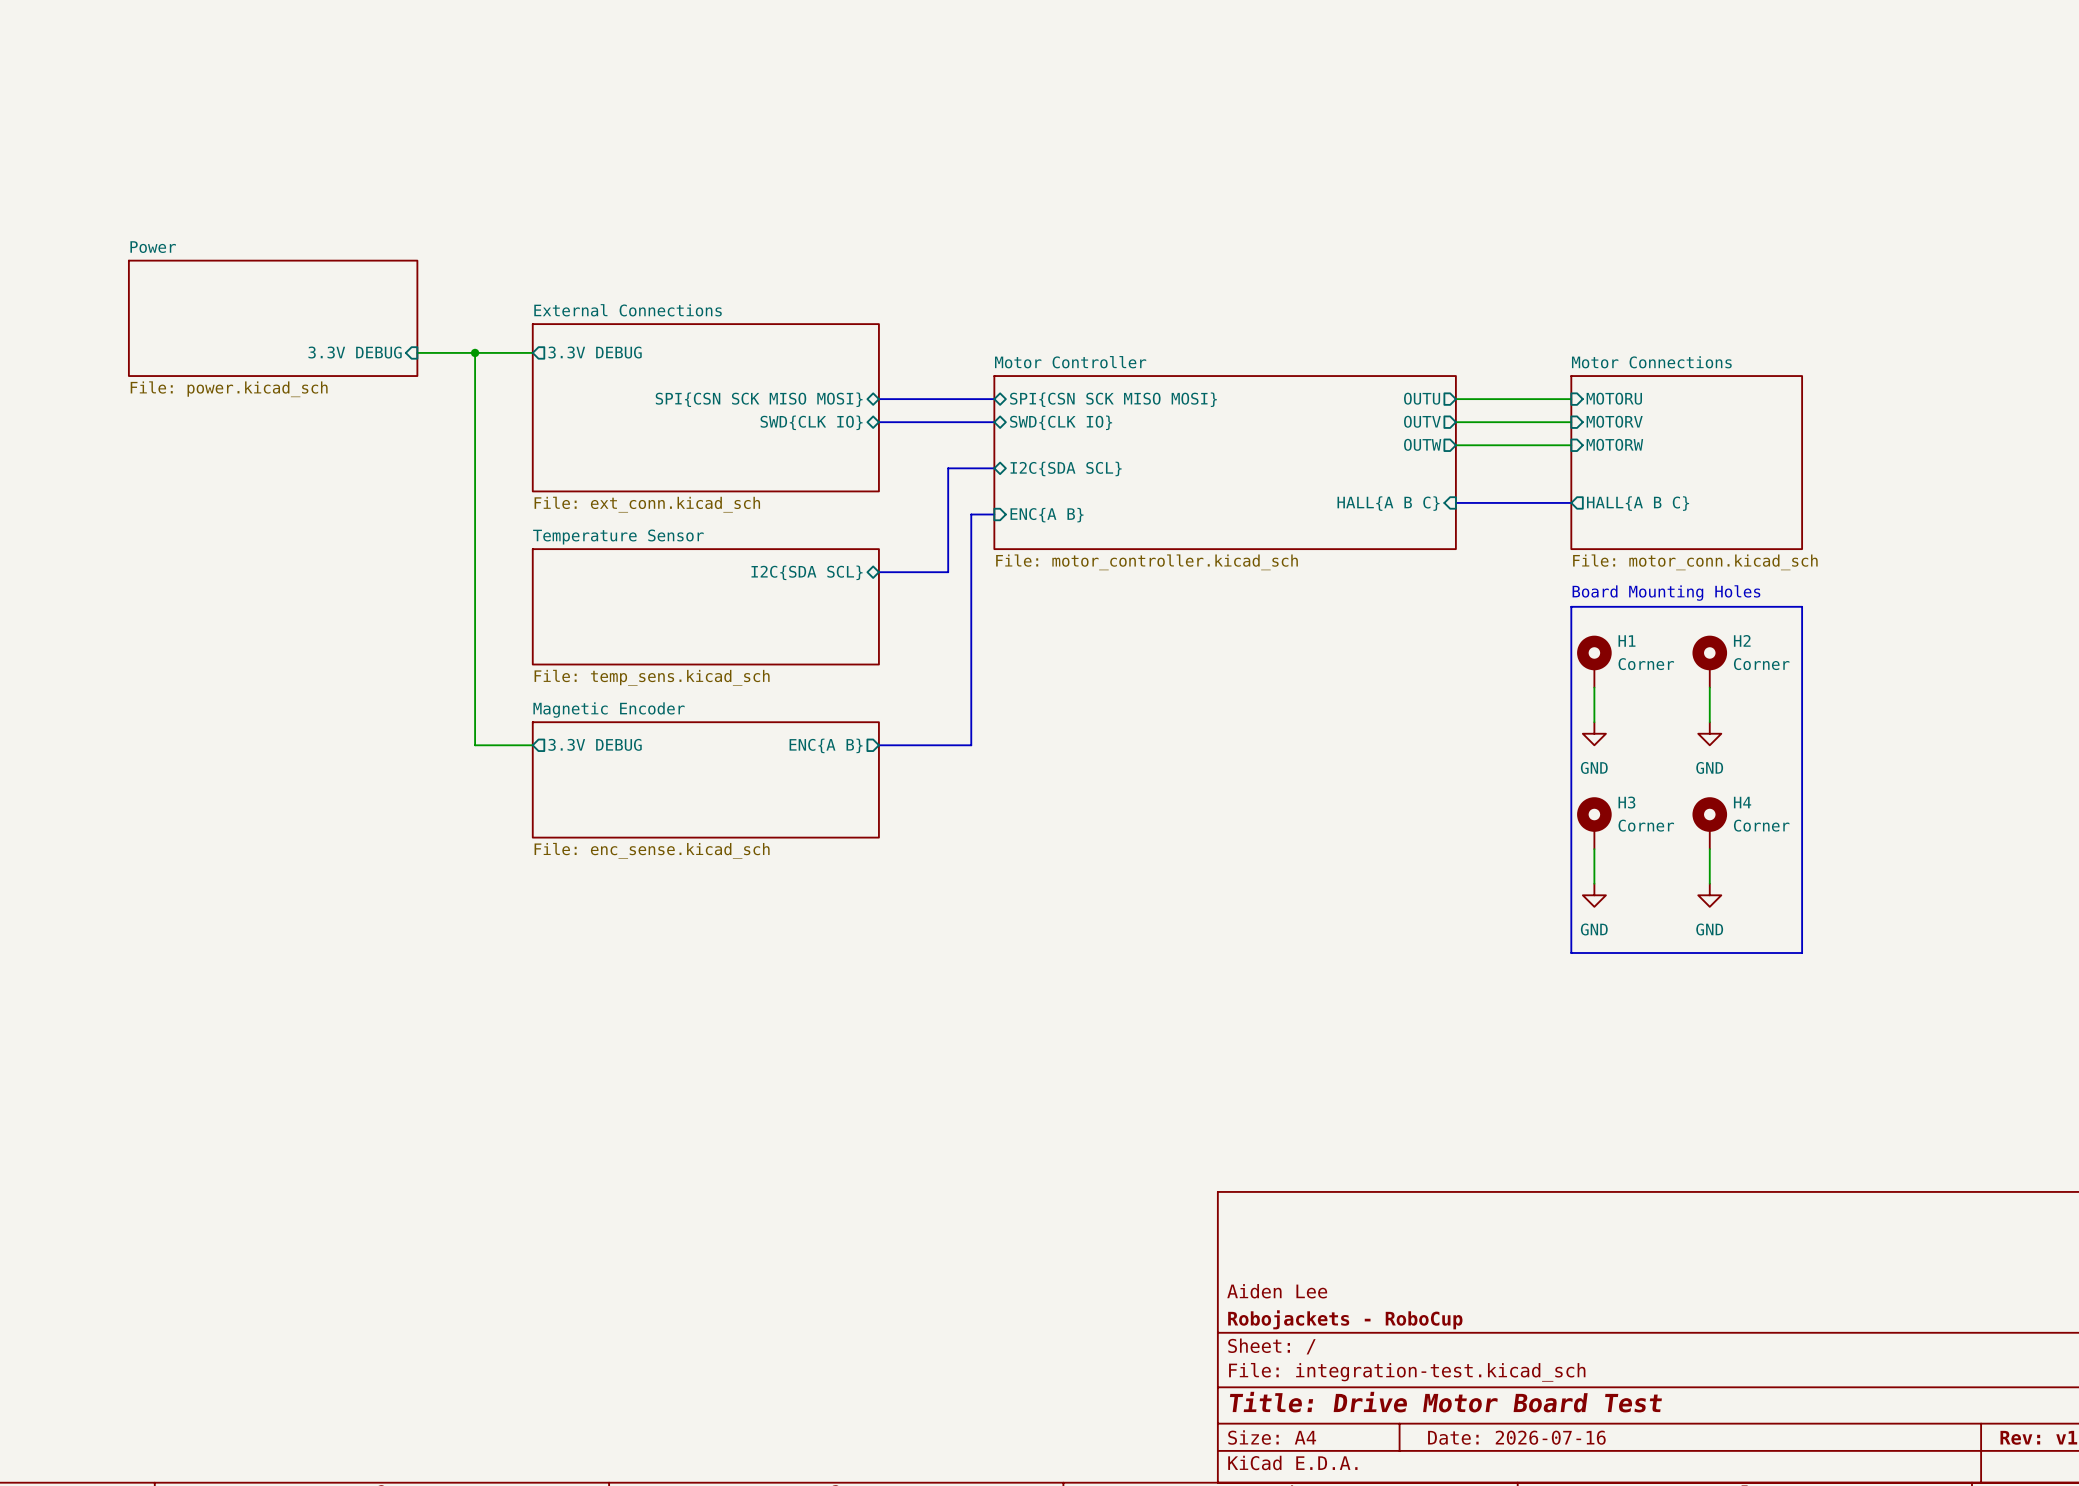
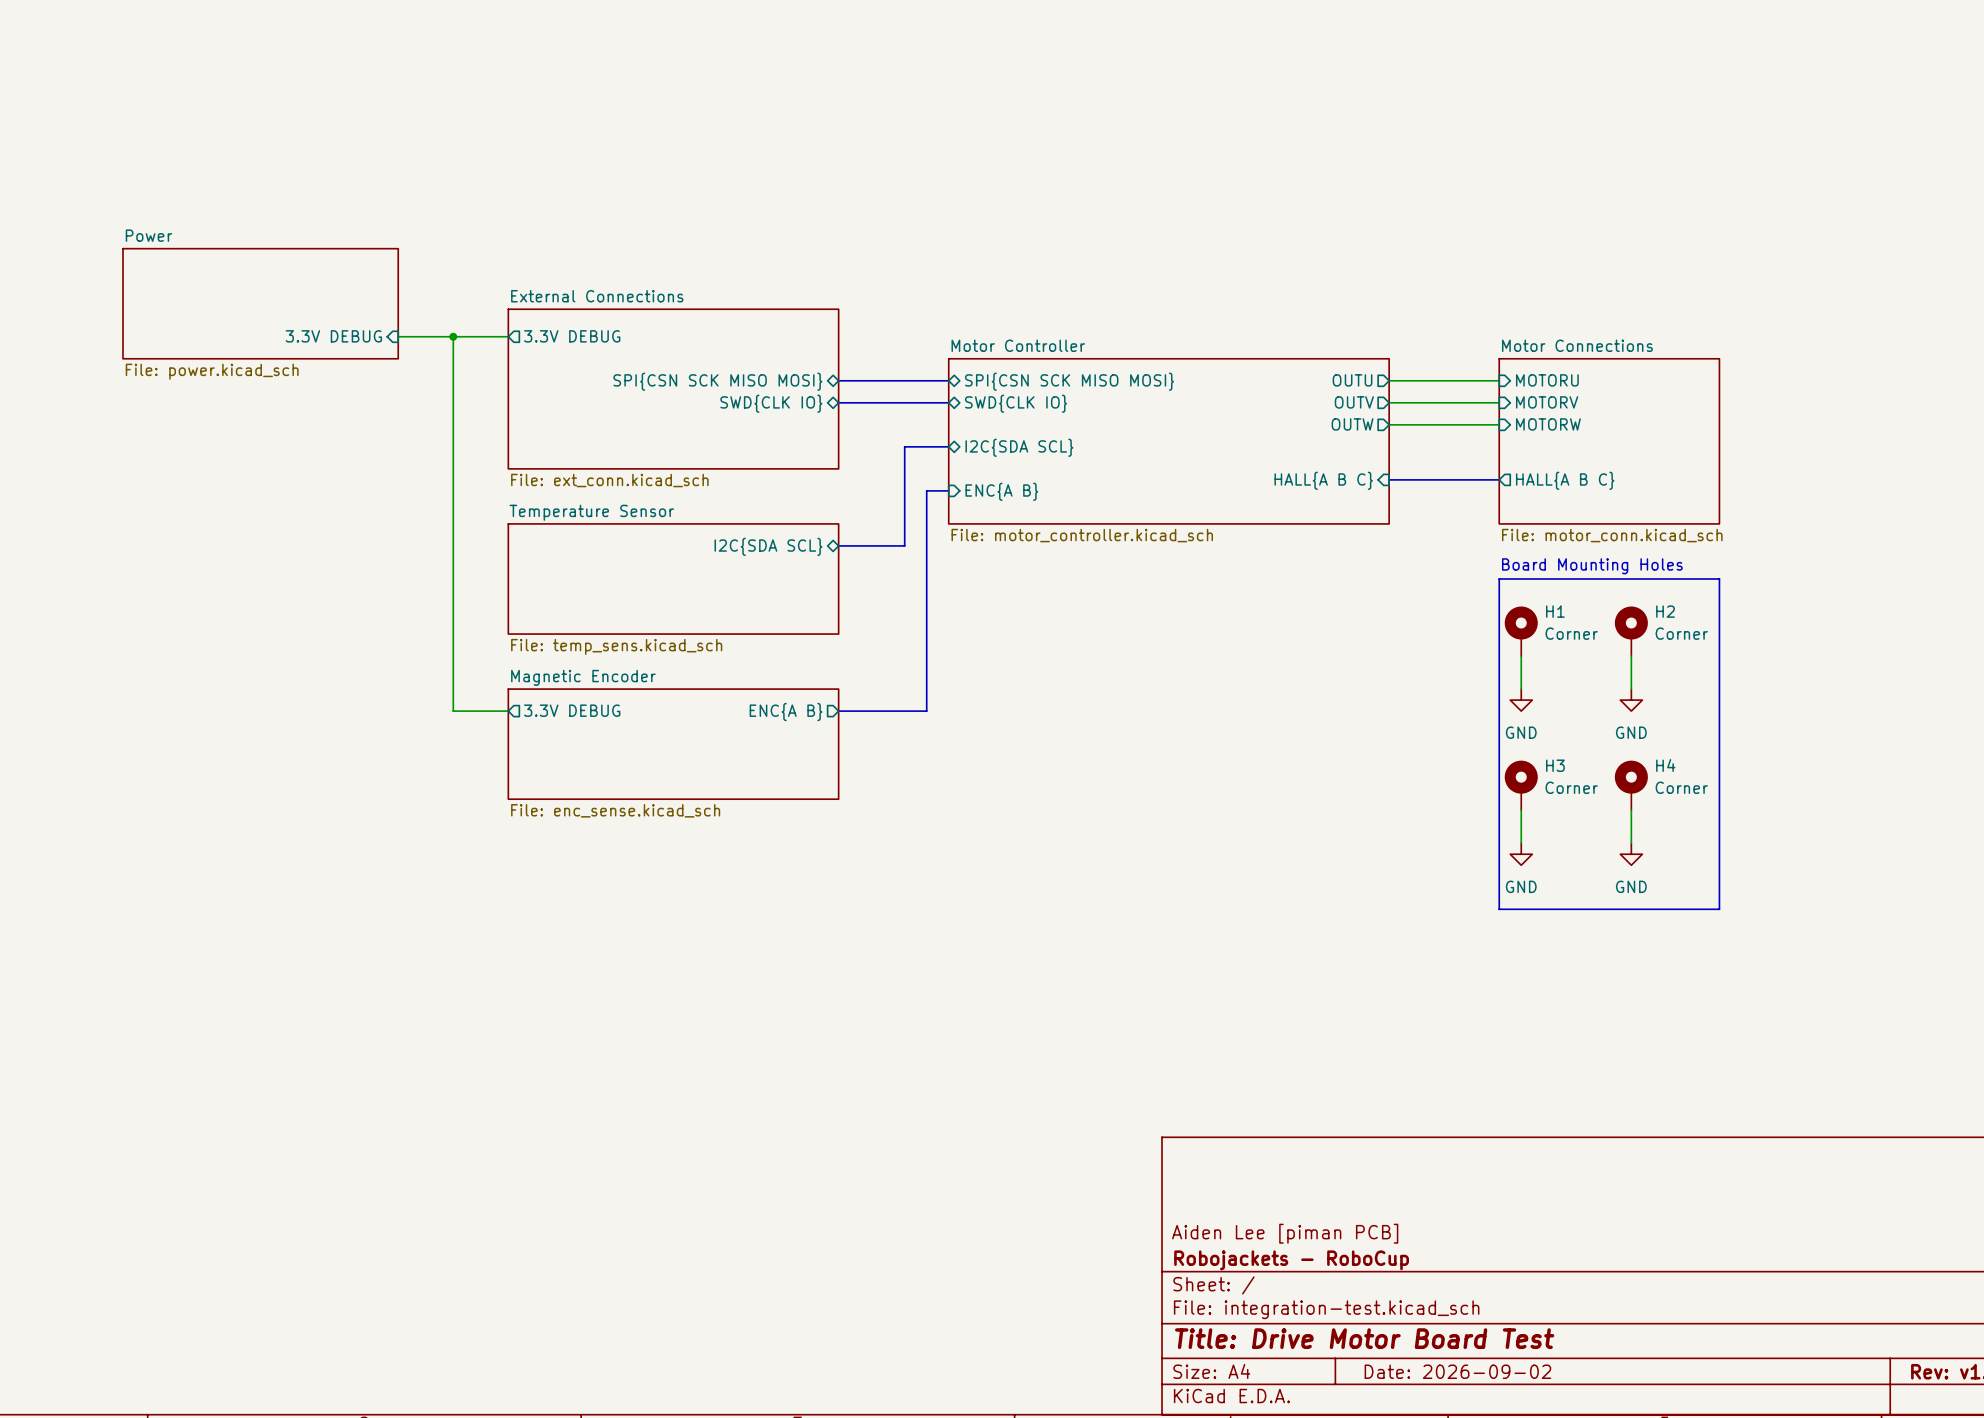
title block: Aiden Lee (1277, 1291) -> Aiden Lee [piman PCB] (1285, 1233)
title block: Date: 2026-07-16 (1516, 1437) -> Date: 2026-09-02 (1457, 1371)

